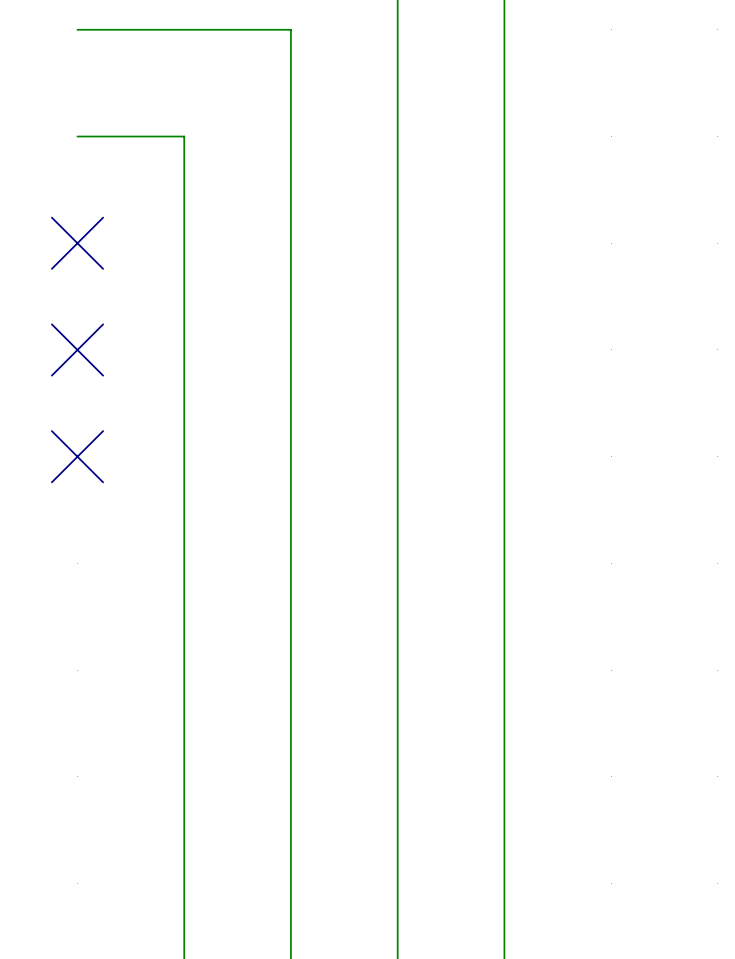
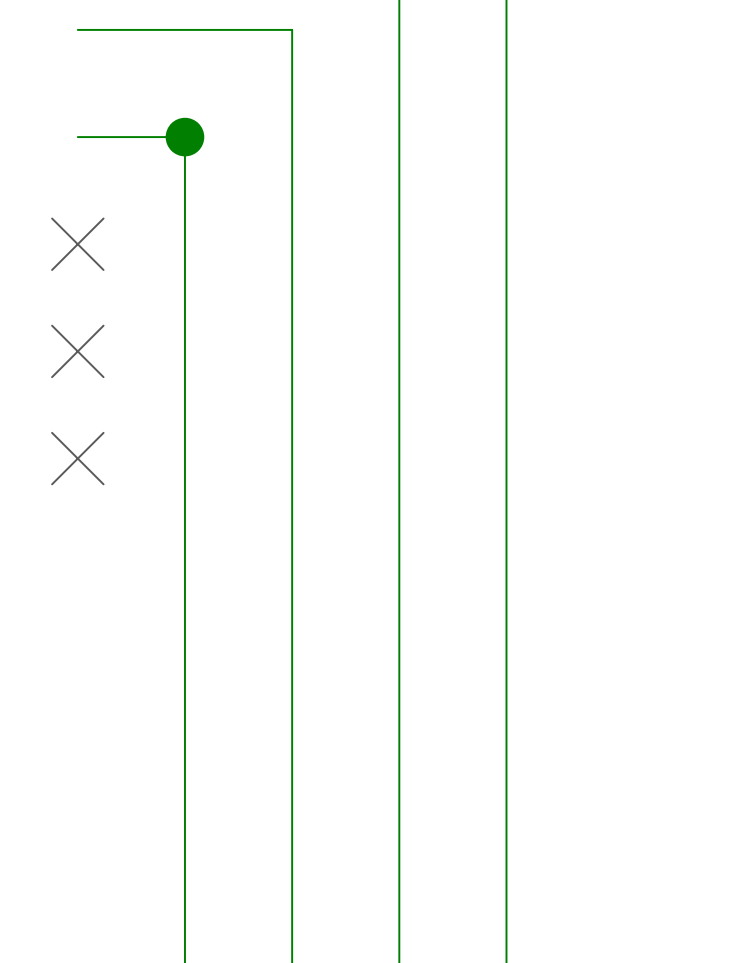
junction: none -> (184, 137)

